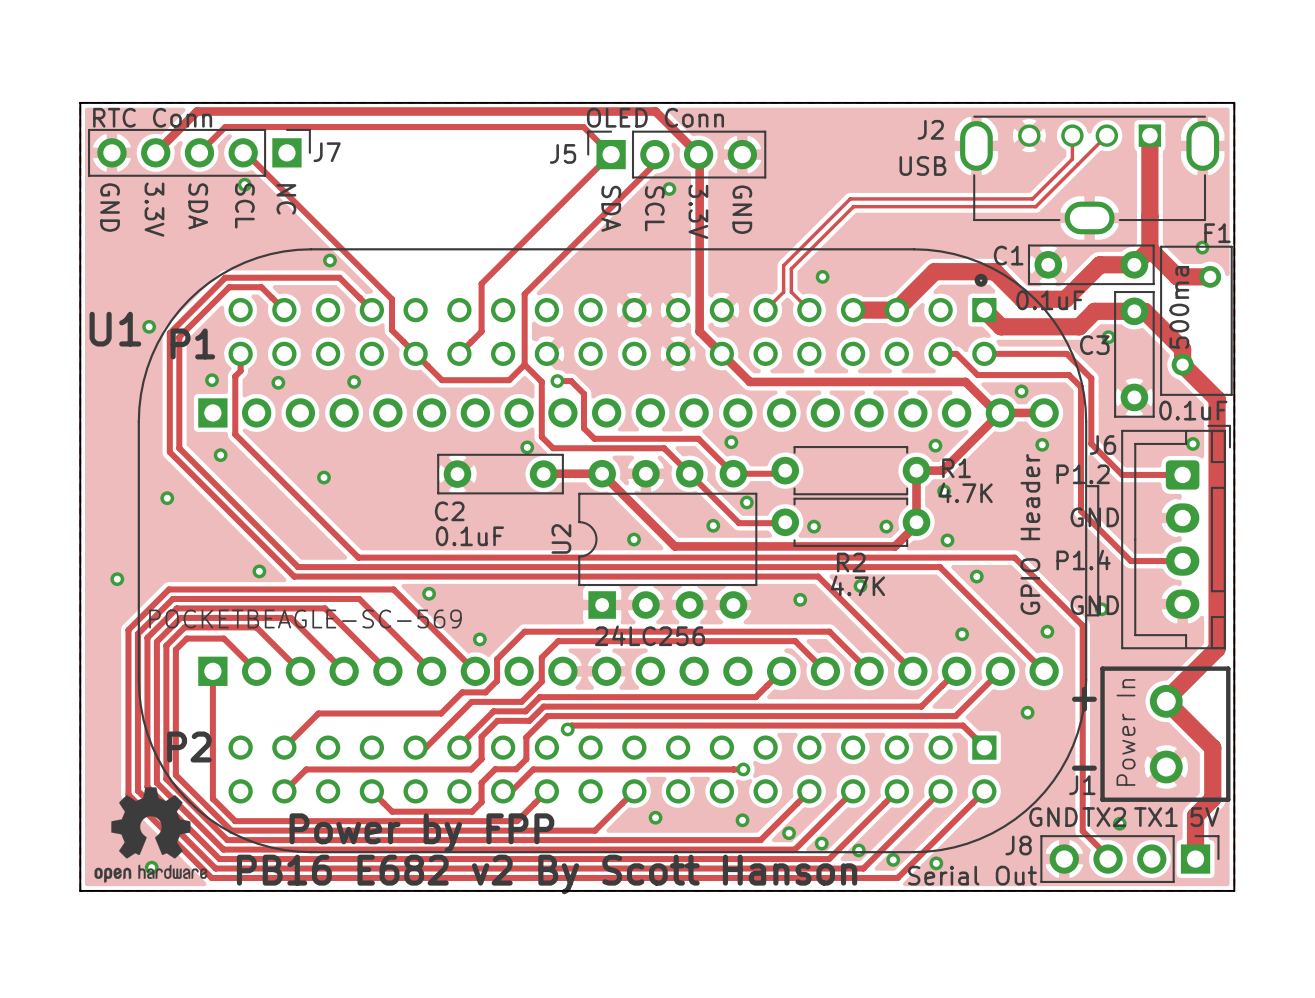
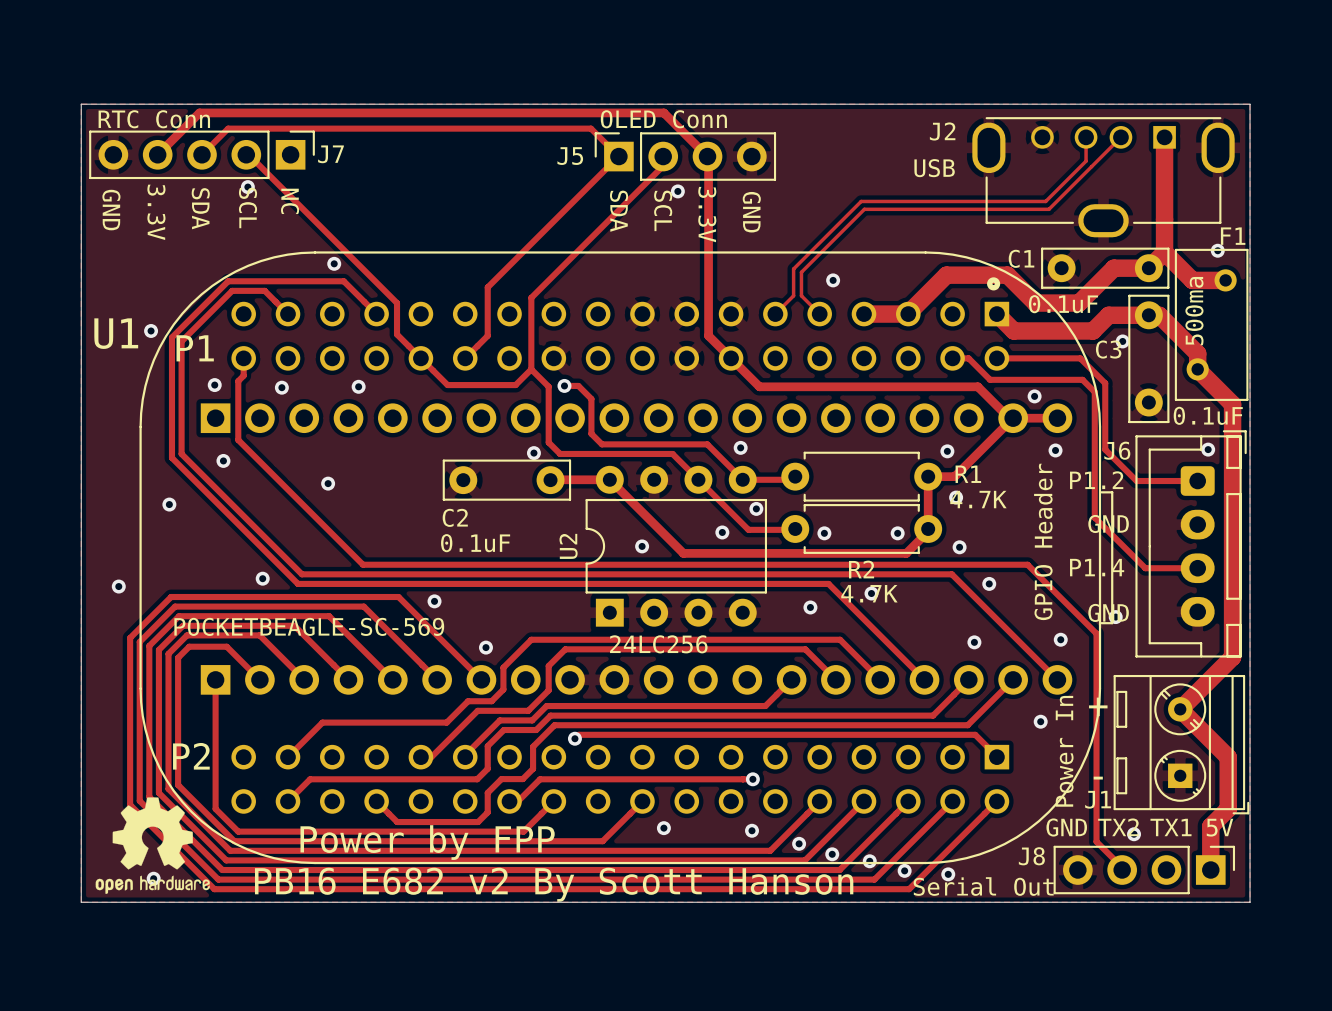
J1 footprint: [1100, 666, 1231, 802] -> [1113, 674, 1250, 815]
J1 value position: Power In (1125, 732) -> Power In (1064, 751)

